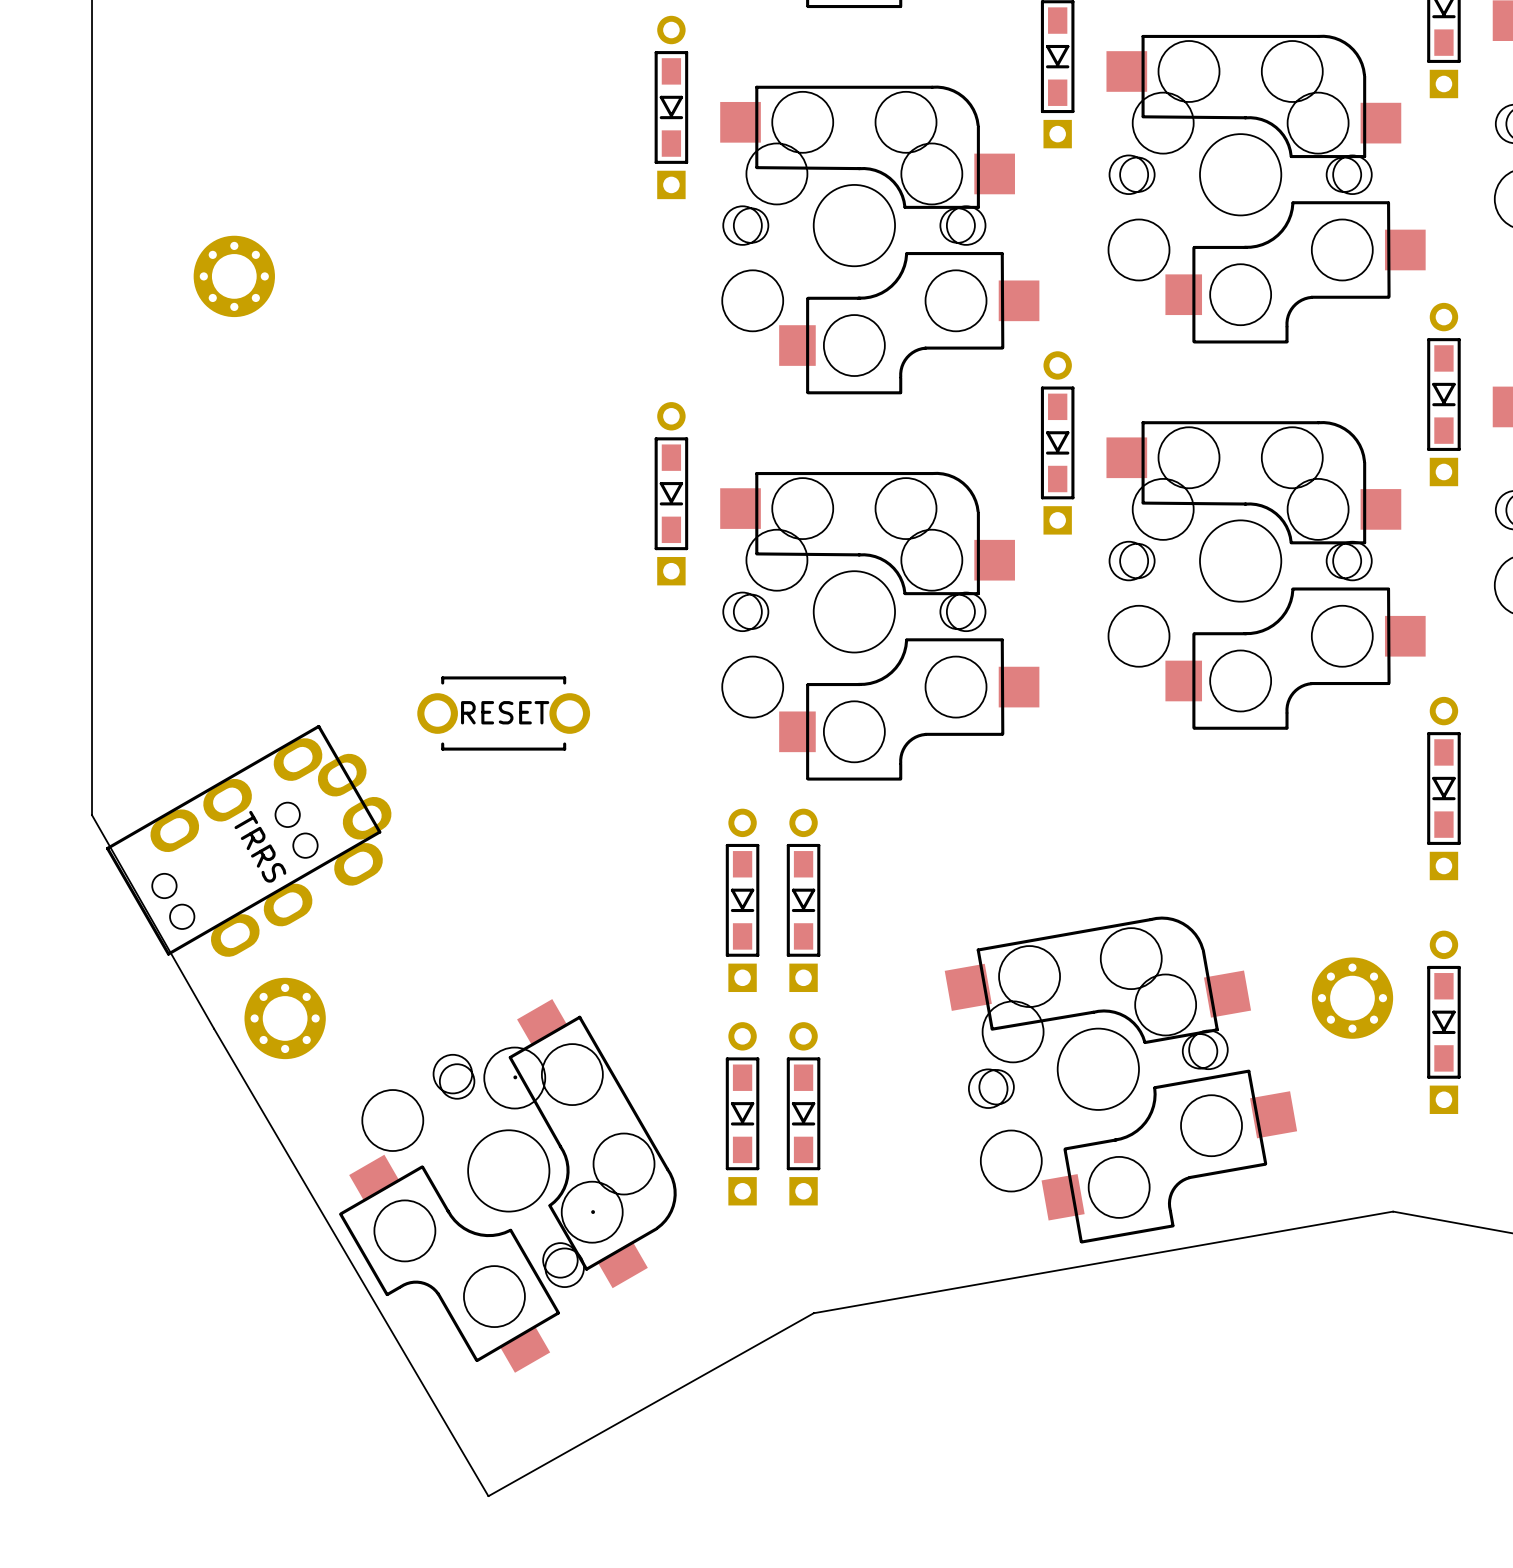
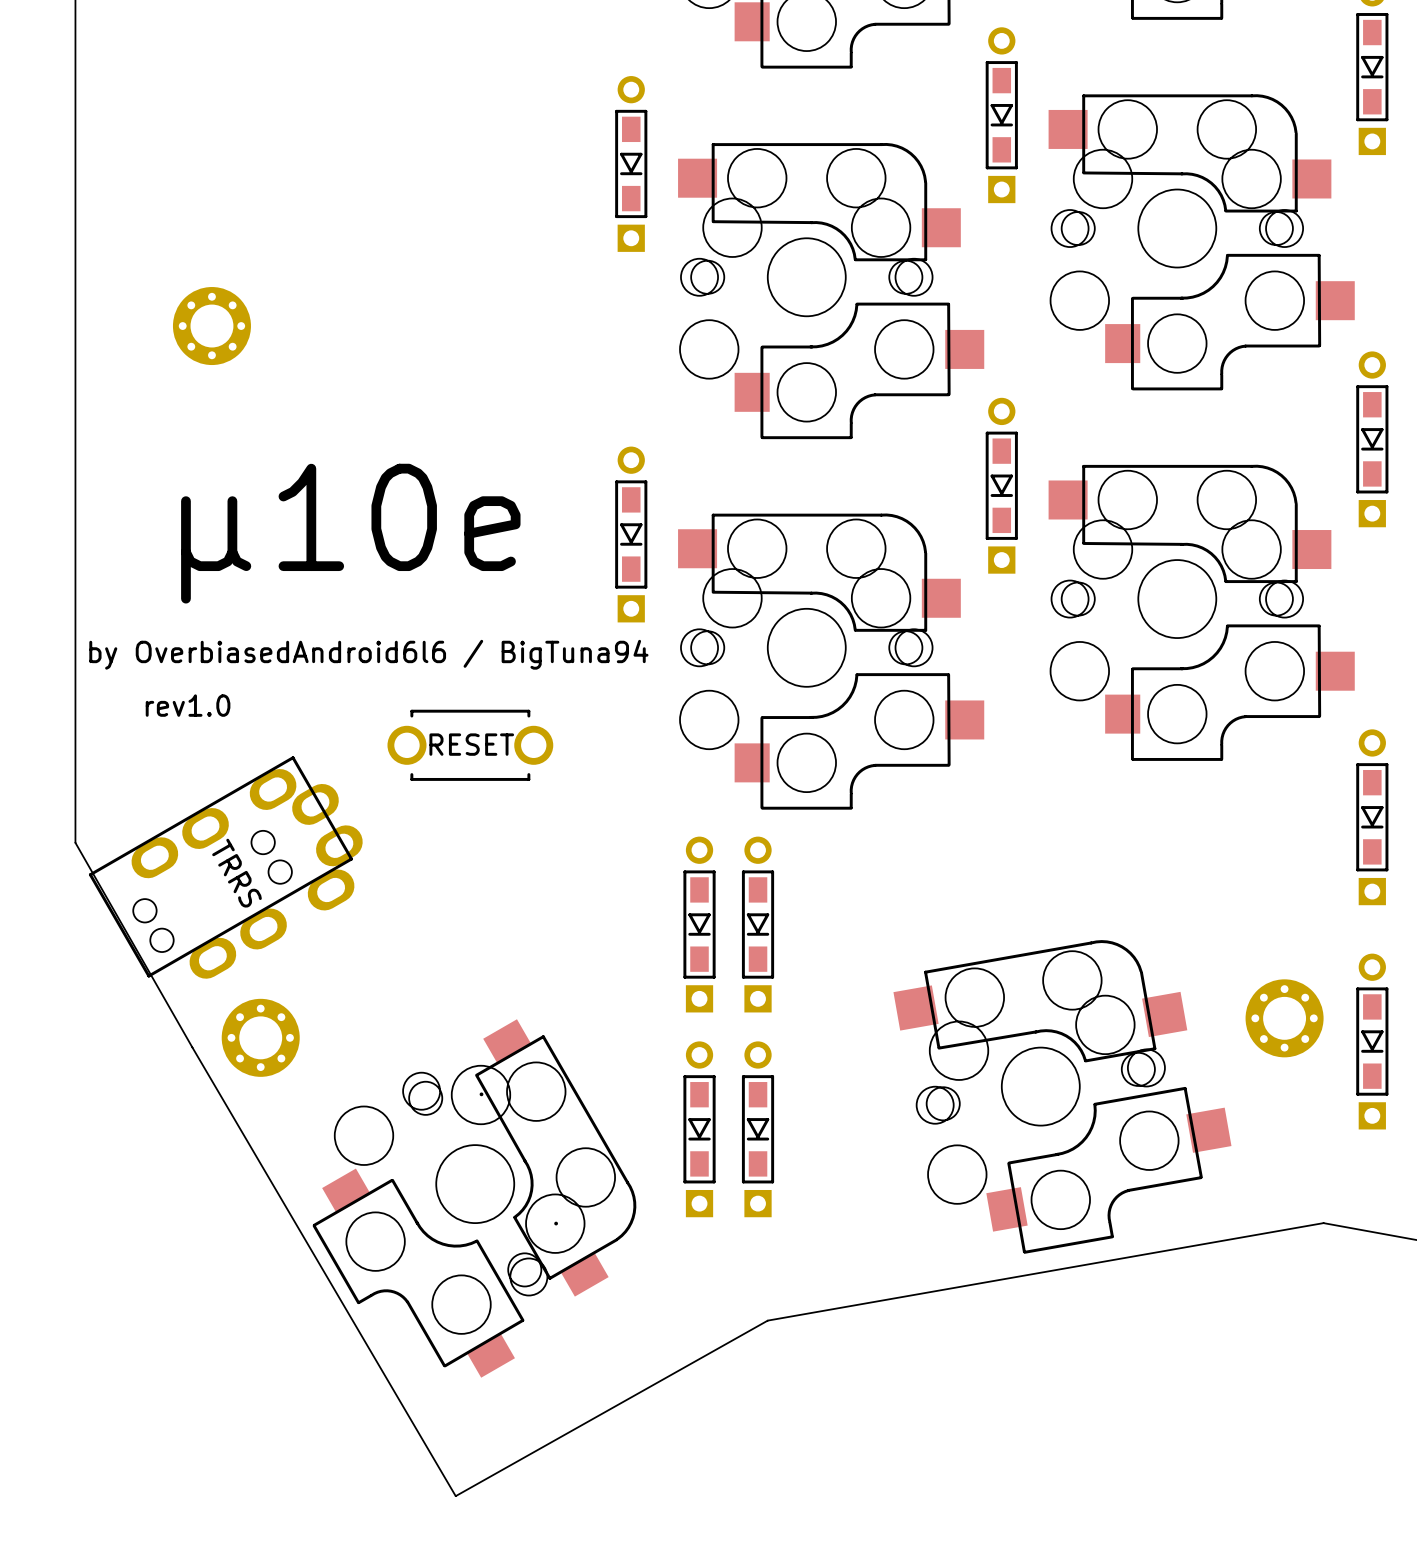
text: none -> μ10e (350, 533)
text: none -> by OverbiasedAndroid6l6 / BigTuna94 (368, 654)
text: none -> rev1.0 (188, 705)

